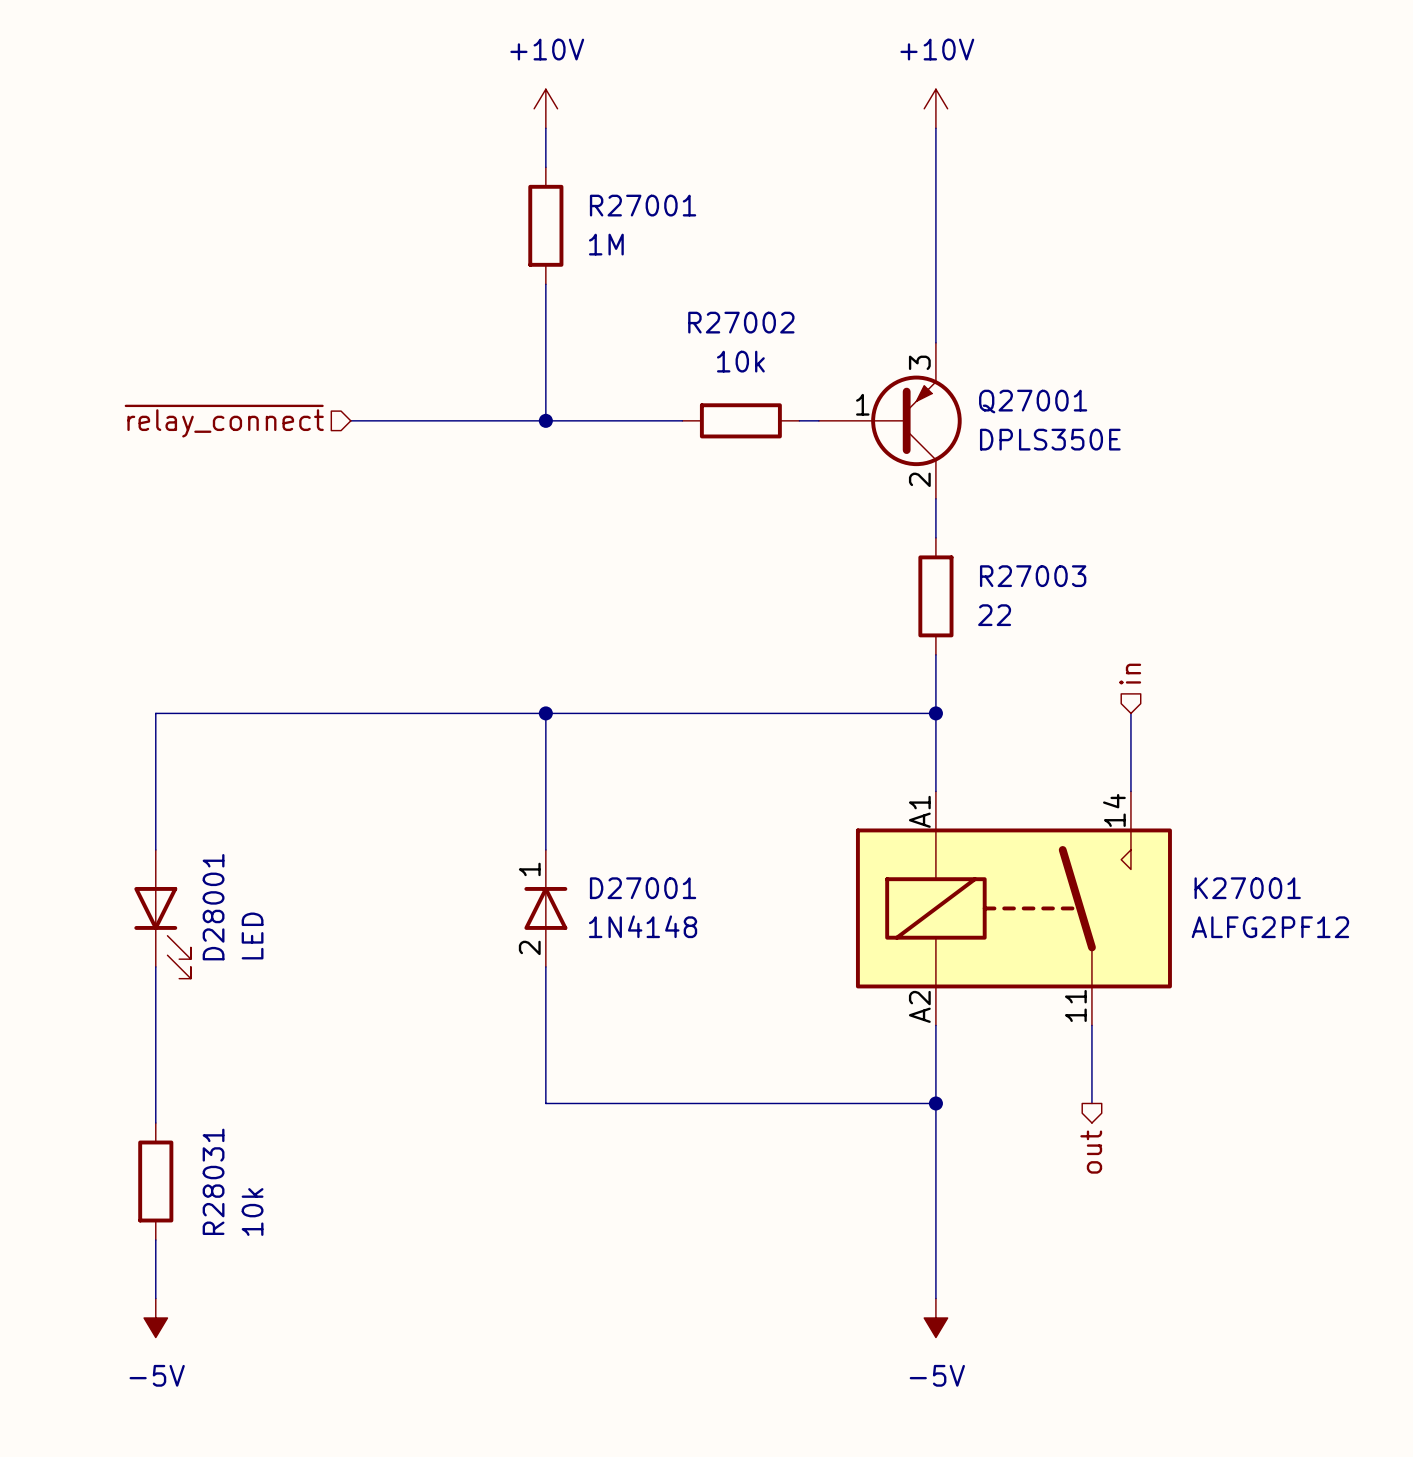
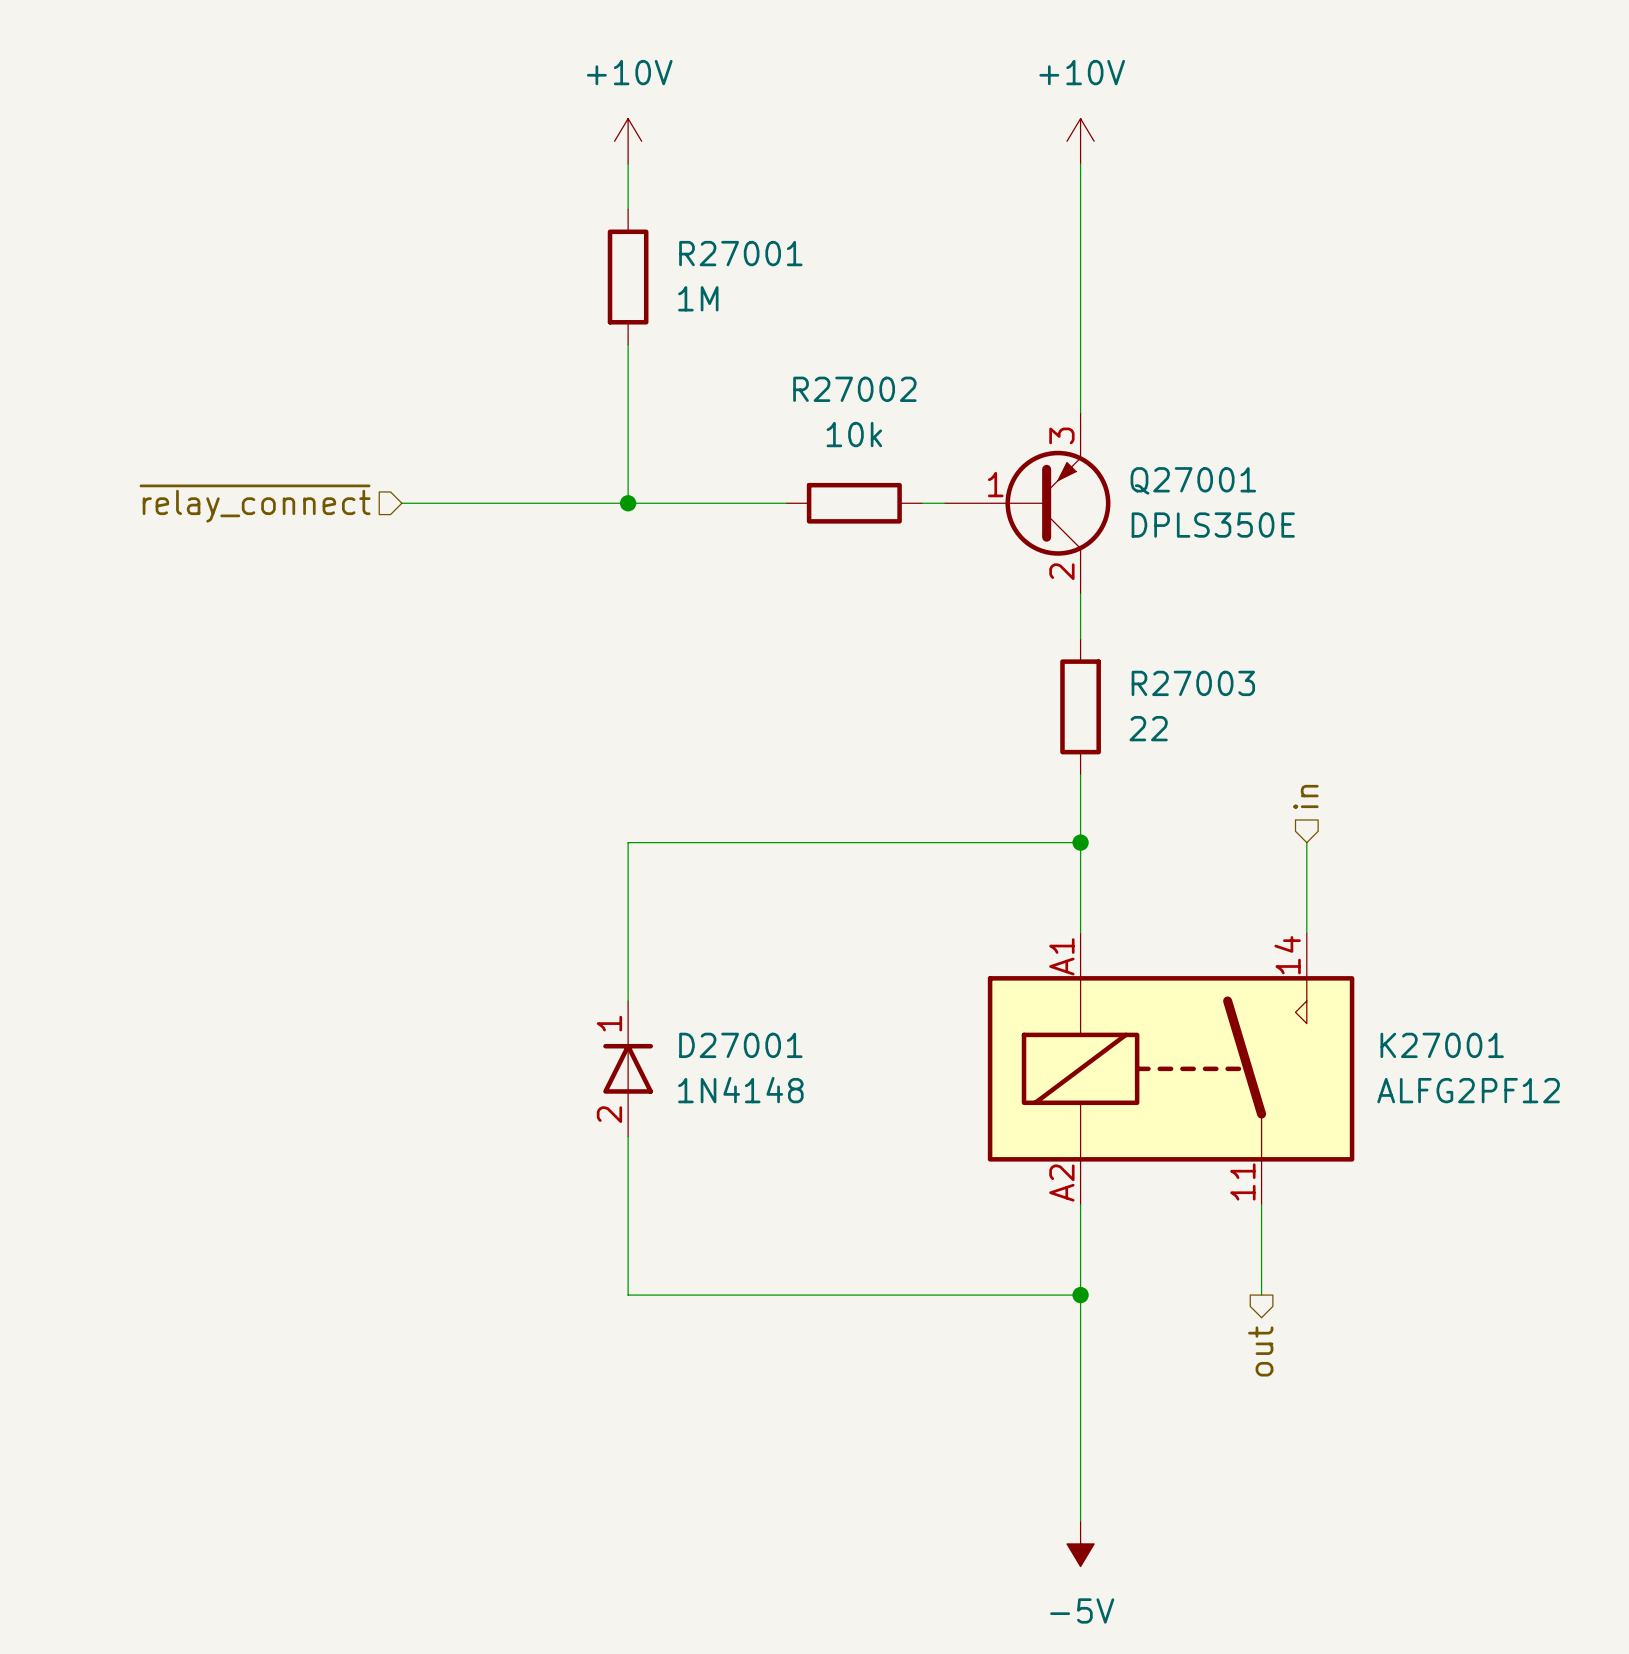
wire: (545, 713) (155, 713) (155, 849) -> none
junction: (545, 713) -> none
D28001: LED (162, 914) -> none
wire: (155, 966) (155, 1122) -> none
R28031: 10k (155, 1181) -> none
wire: (155, 1240) (155, 1298) -> none
power symbol: -5V (155, 1318) -> none

